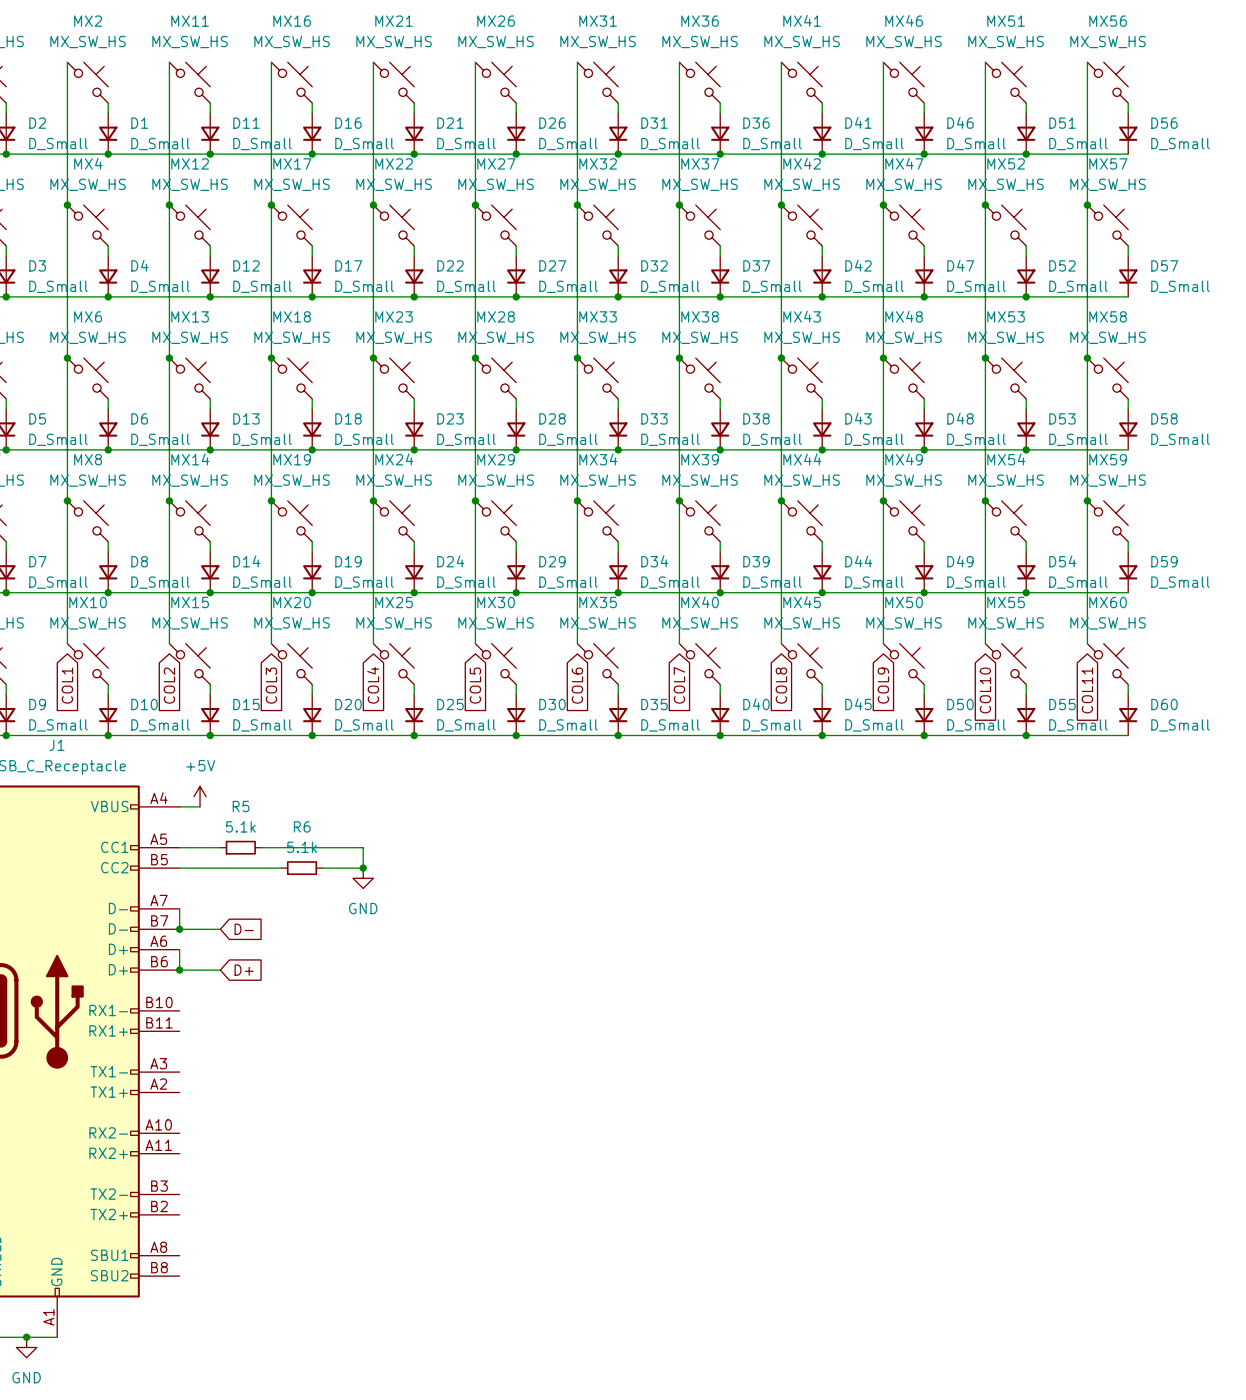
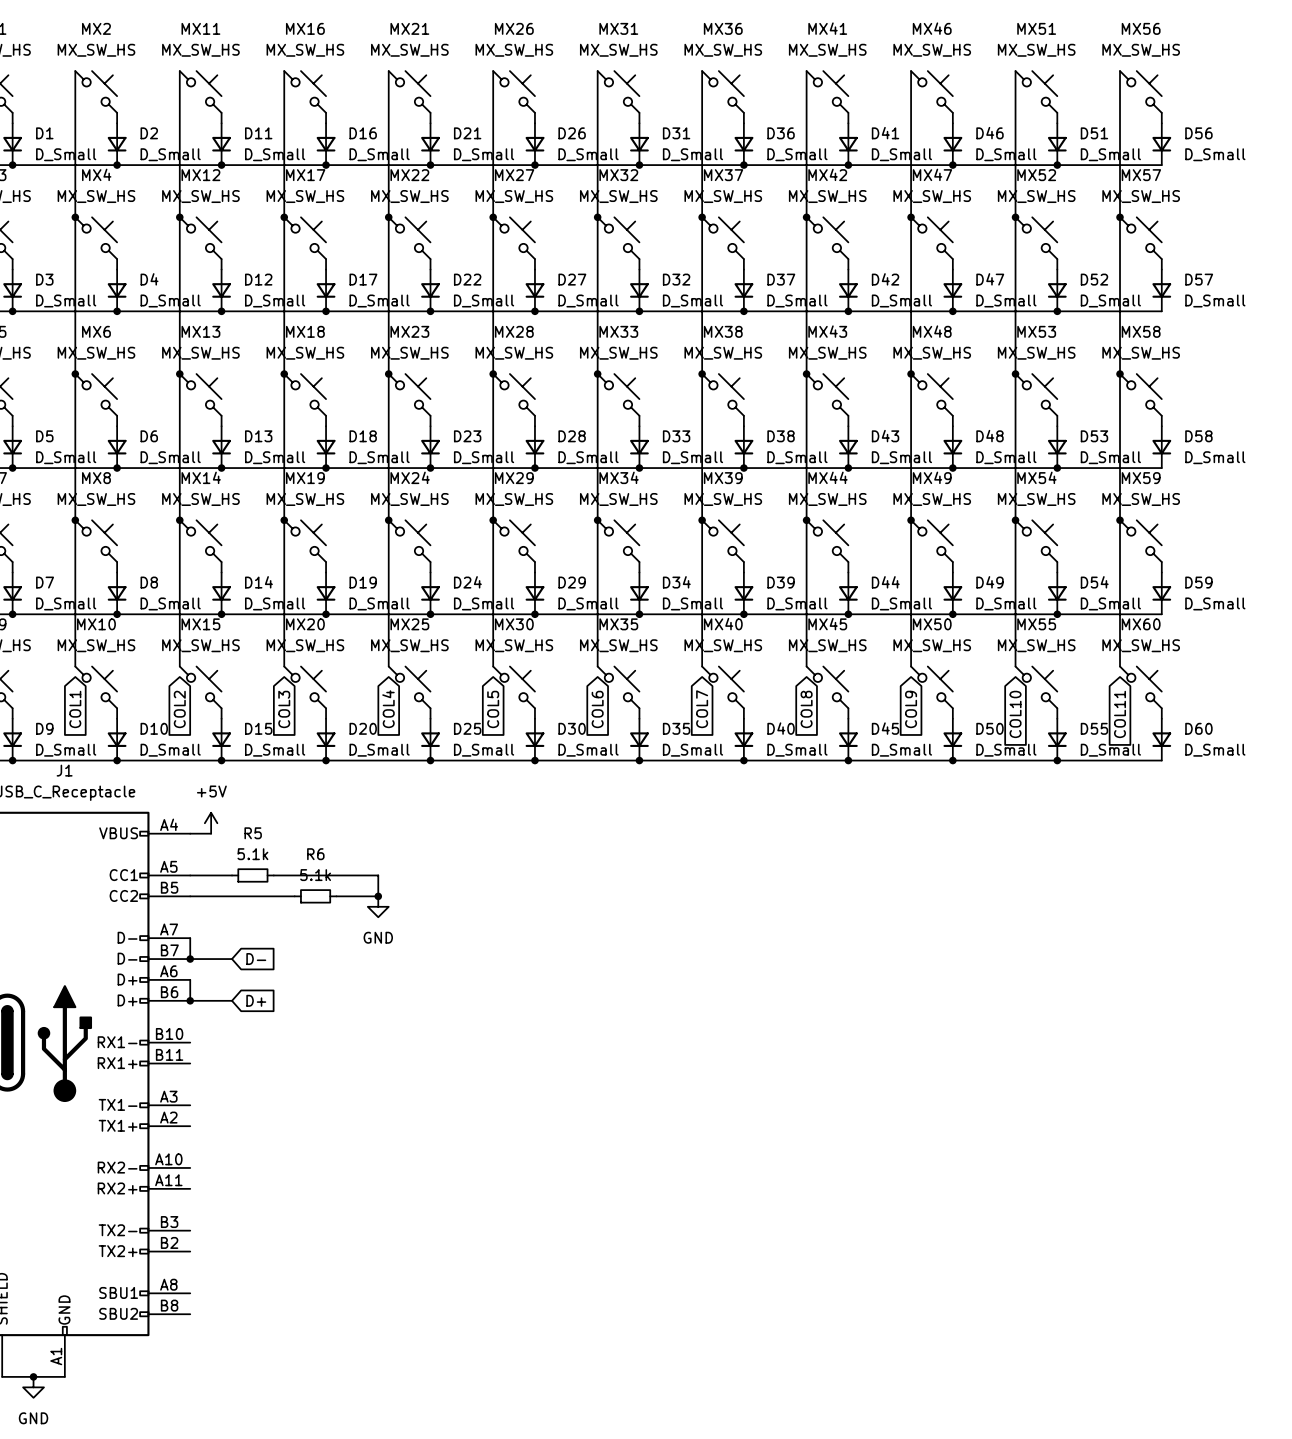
D2 name: D2 (37, 123) -> D1 (44, 133)
D1 name: D1 (139, 123) -> D2 (149, 133)

